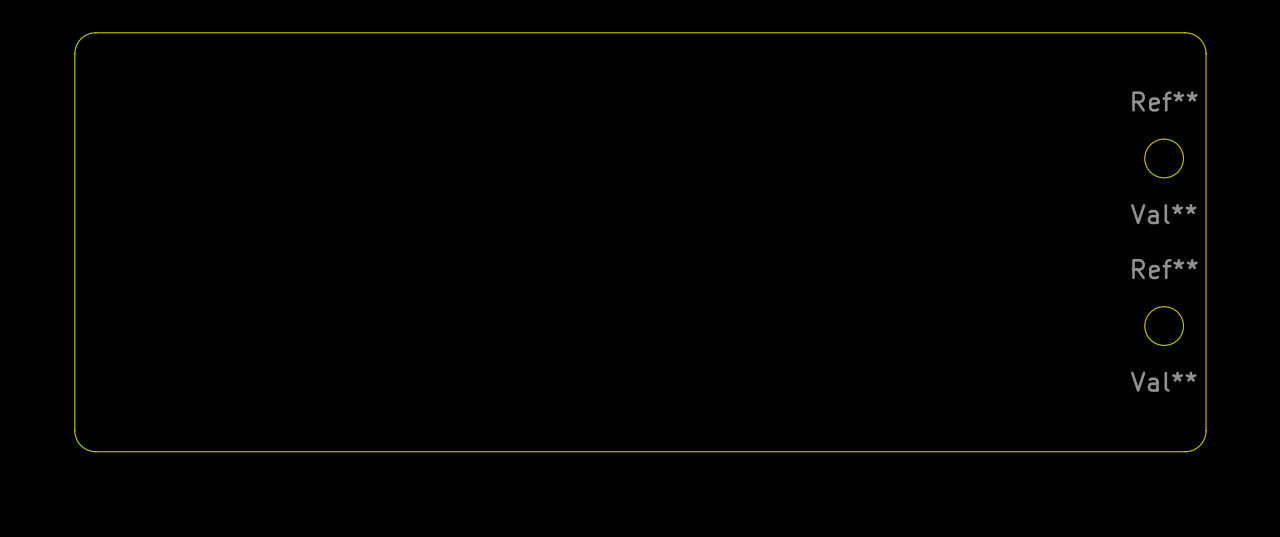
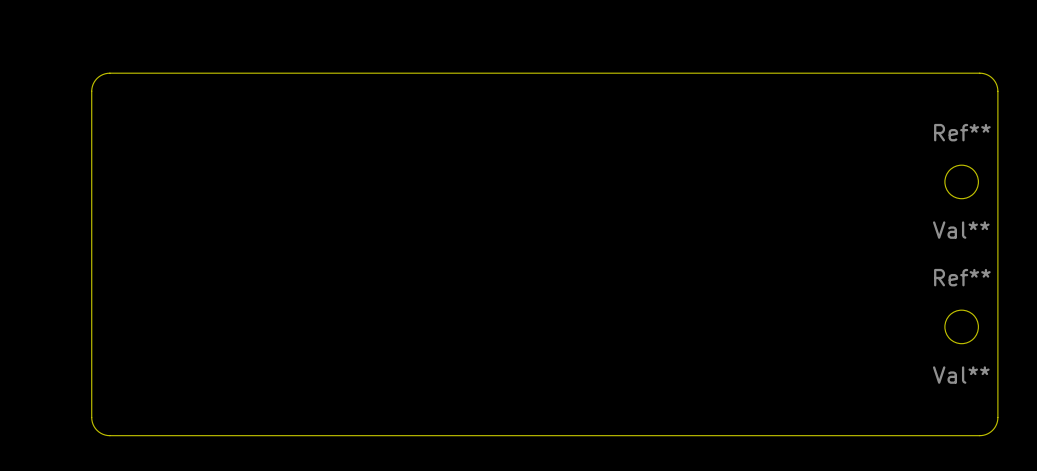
board edge: (179, 32) (90, 33) (79, 40) (74, 53) (75, 436) (83, 447) (93, 451) (179, 451) -> (109, 73) (97, 78) (91, 91) (91, 417) (97, 430) (109, 435)

